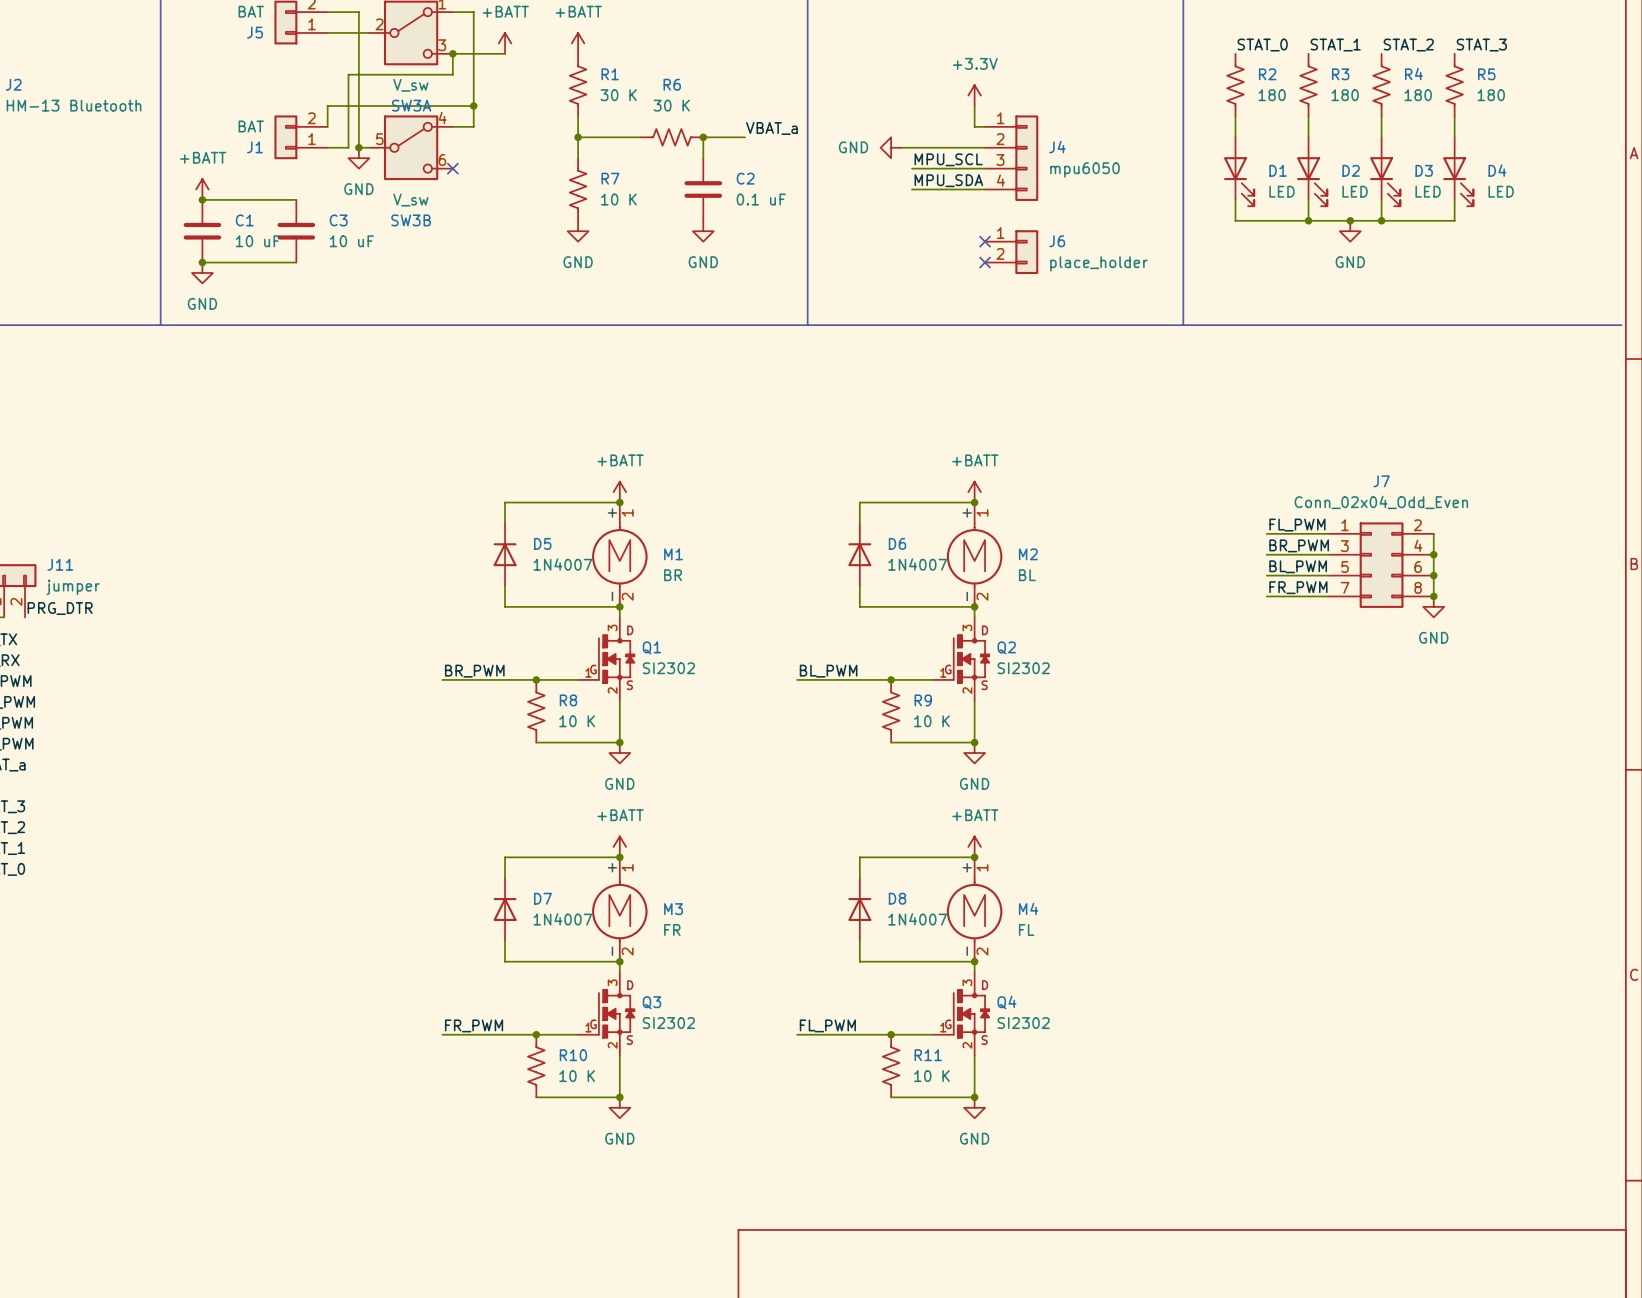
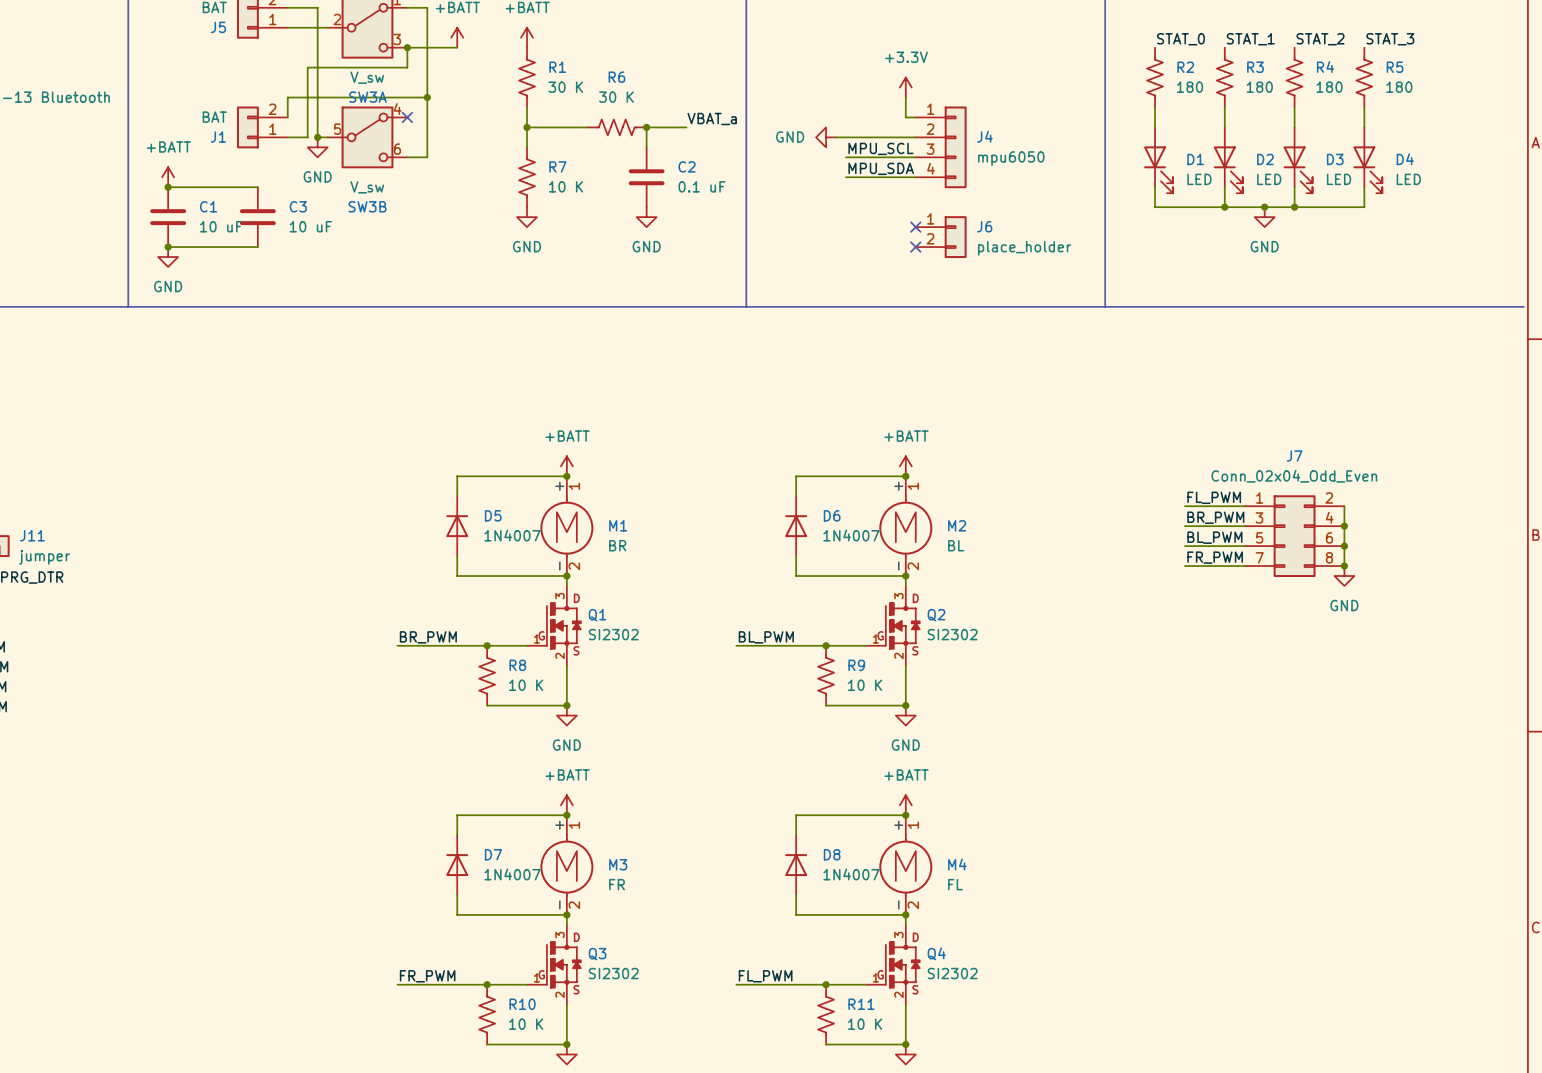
wire: (452, 126) (473, 126) -> (407, 157) (427, 157) (427, 117)
no-connect mark position: (452, 168) -> (407, 117)

